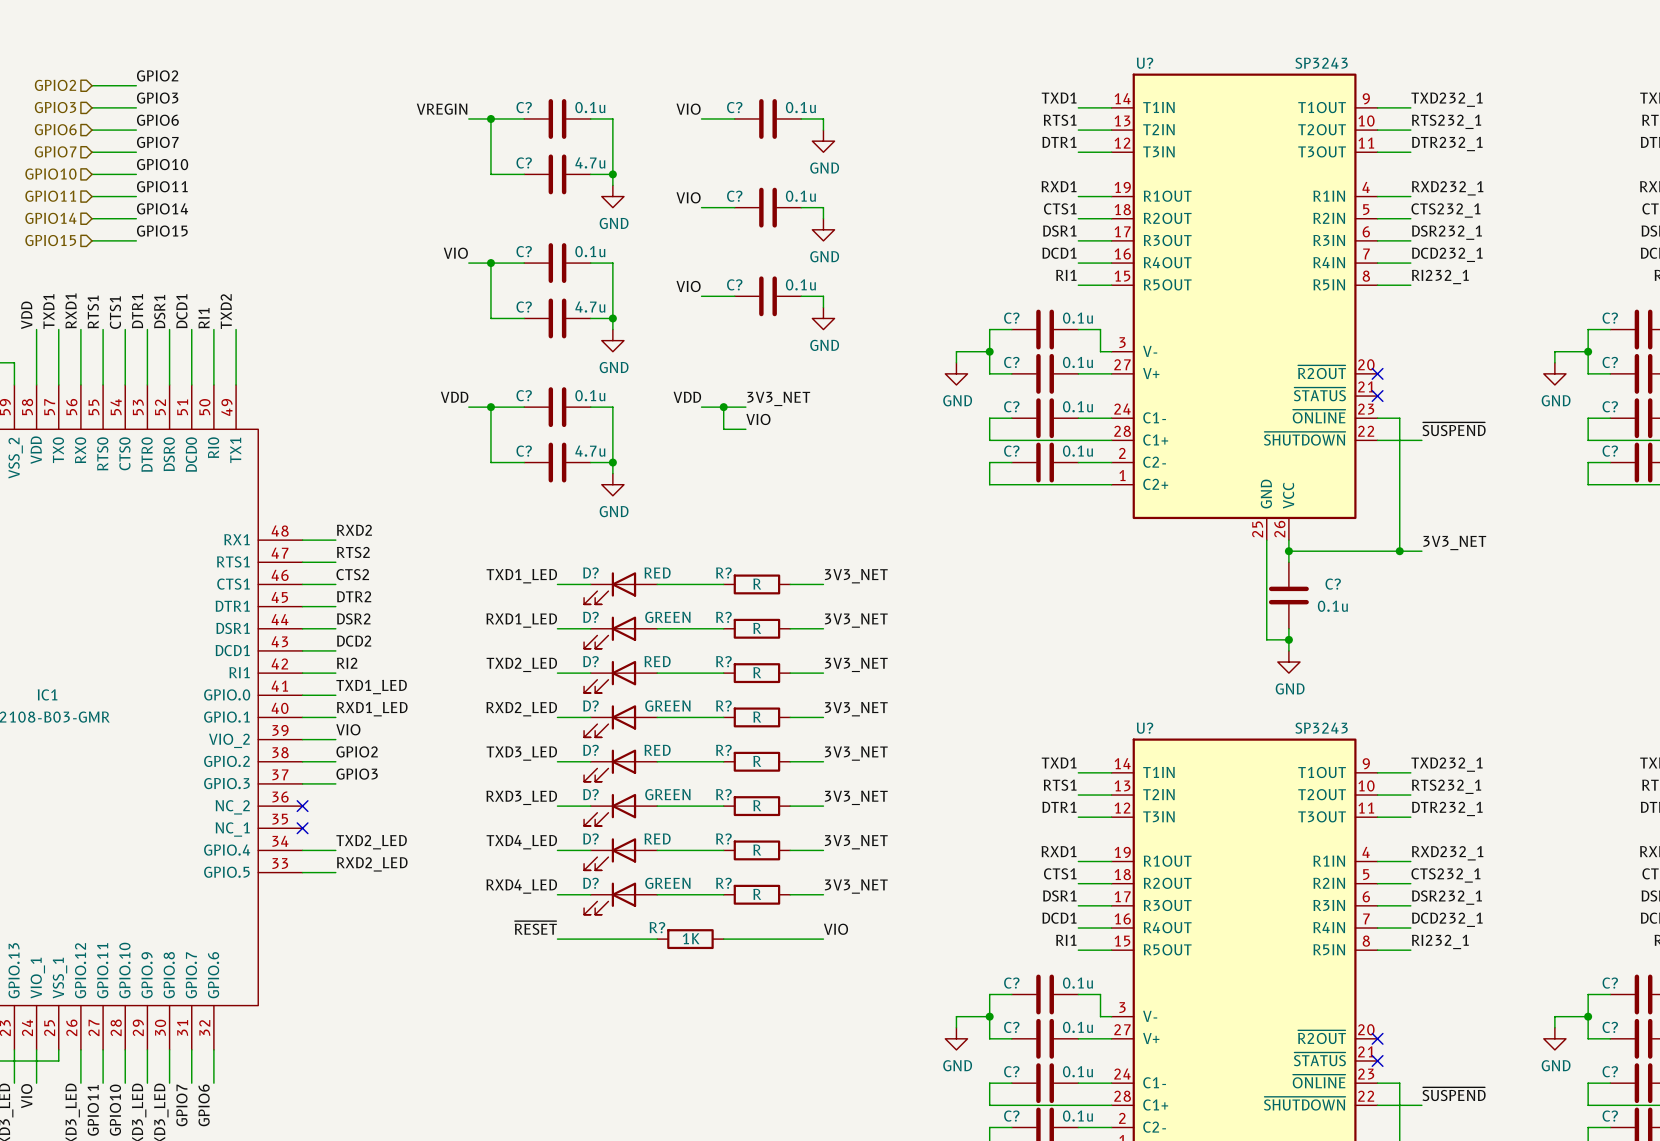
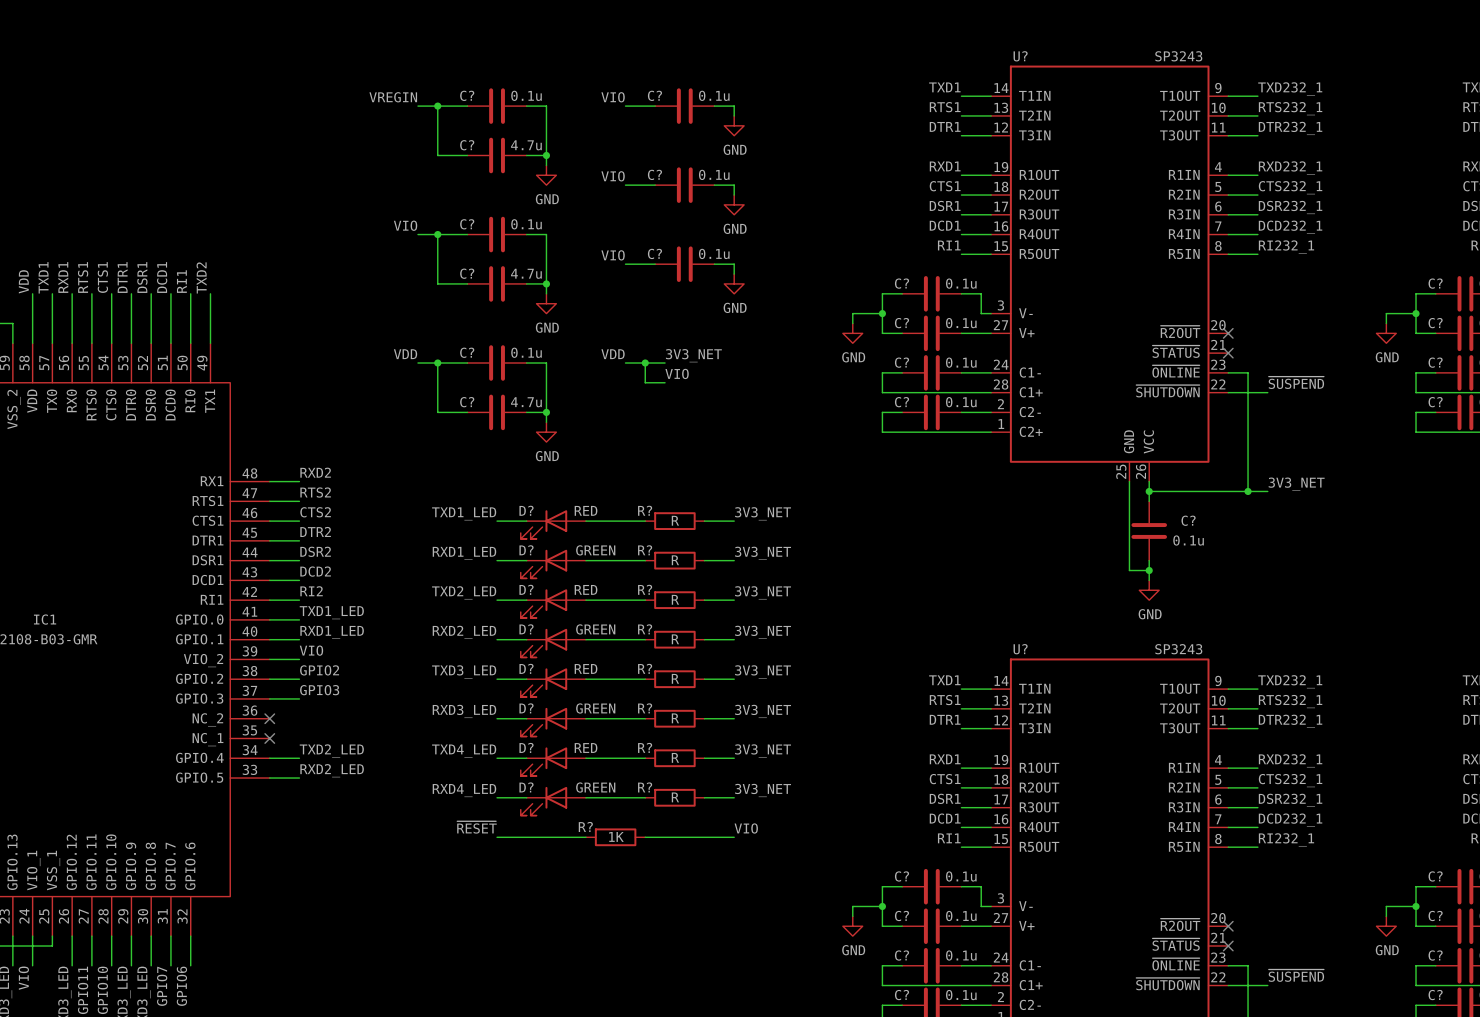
label: GPIO2 (157, 75) -> none
hierarchical label: GPIO2 (55, 85) -> none
wire: (92, 85) (136, 85) -> none
label: GPIO3 (157, 98) -> none
hierarchical label: GPIO3 (55, 107) -> none
wire: (92, 107) (136, 107) -> none
label: GPIO6 (157, 120) -> none
hierarchical label: GPIO6 (55, 129) -> none
wire: (92, 130) (136, 130) -> none
label: GPIO7 (157, 142) -> none
hierarchical label: GPIO7 (55, 151) -> none
wire: (92, 152) (136, 152) -> none
label: GPIO10 (162, 164) -> none
hierarchical label: GPIO10 (50, 174) -> none
wire: (92, 174) (136, 174) -> none
label: GPIO11 (162, 186) -> none
hierarchical label: GPIO11 (50, 196) -> none
wire: (92, 196) (136, 196) -> none
label: GPIO14 (162, 208) -> none
hierarchical label: GPIO14 (50, 218) -> none
wire: (92, 218) (136, 218) -> none
label: GPIO15 (162, 231) -> none
hierarchical label: GPIO15 (50, 240) -> none
wire: (92, 240) (136, 240) -> none

